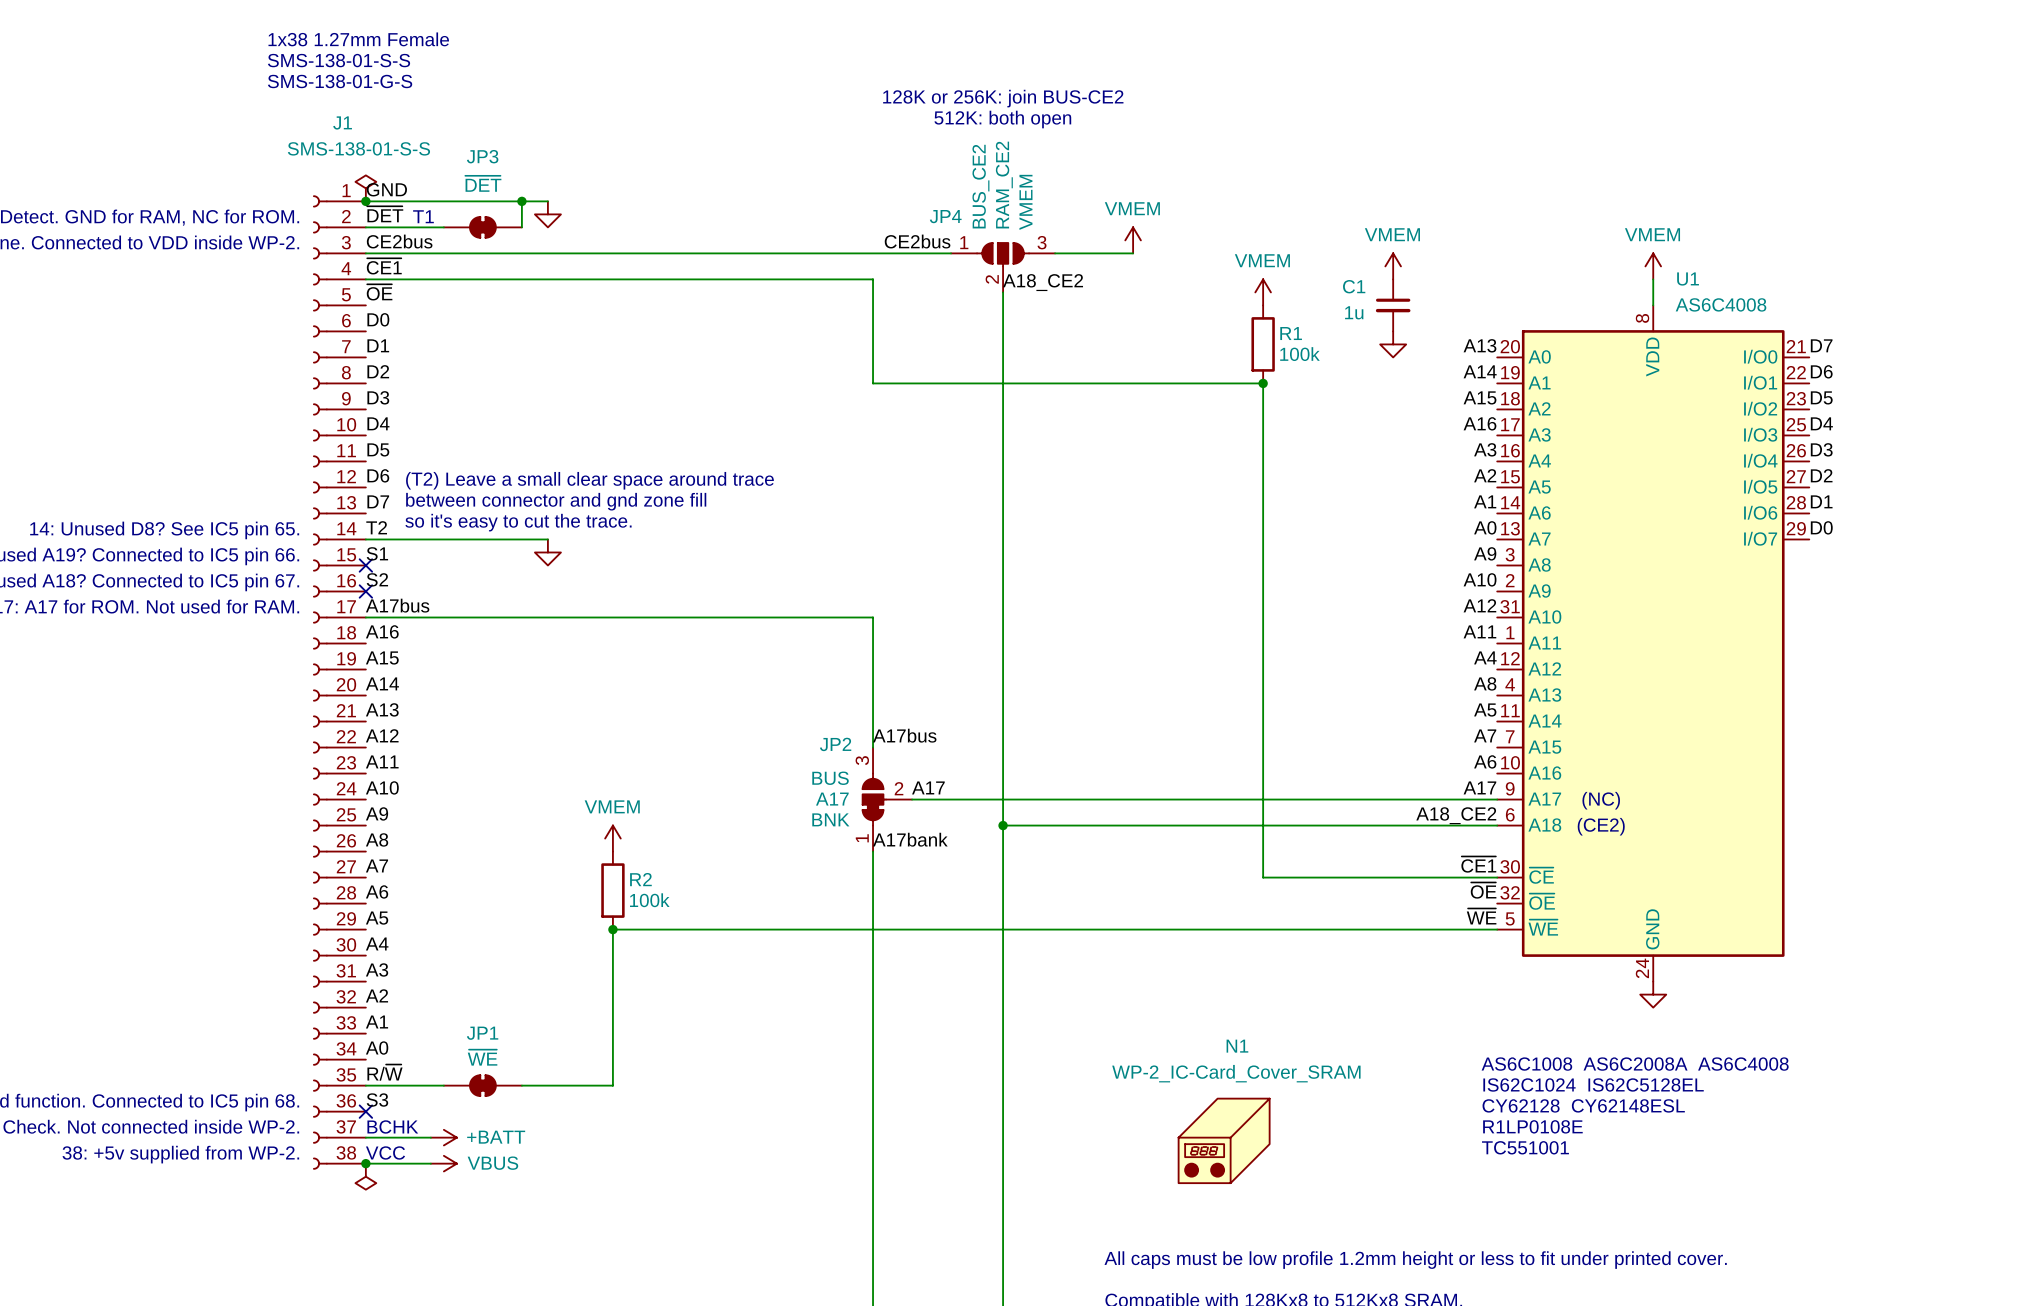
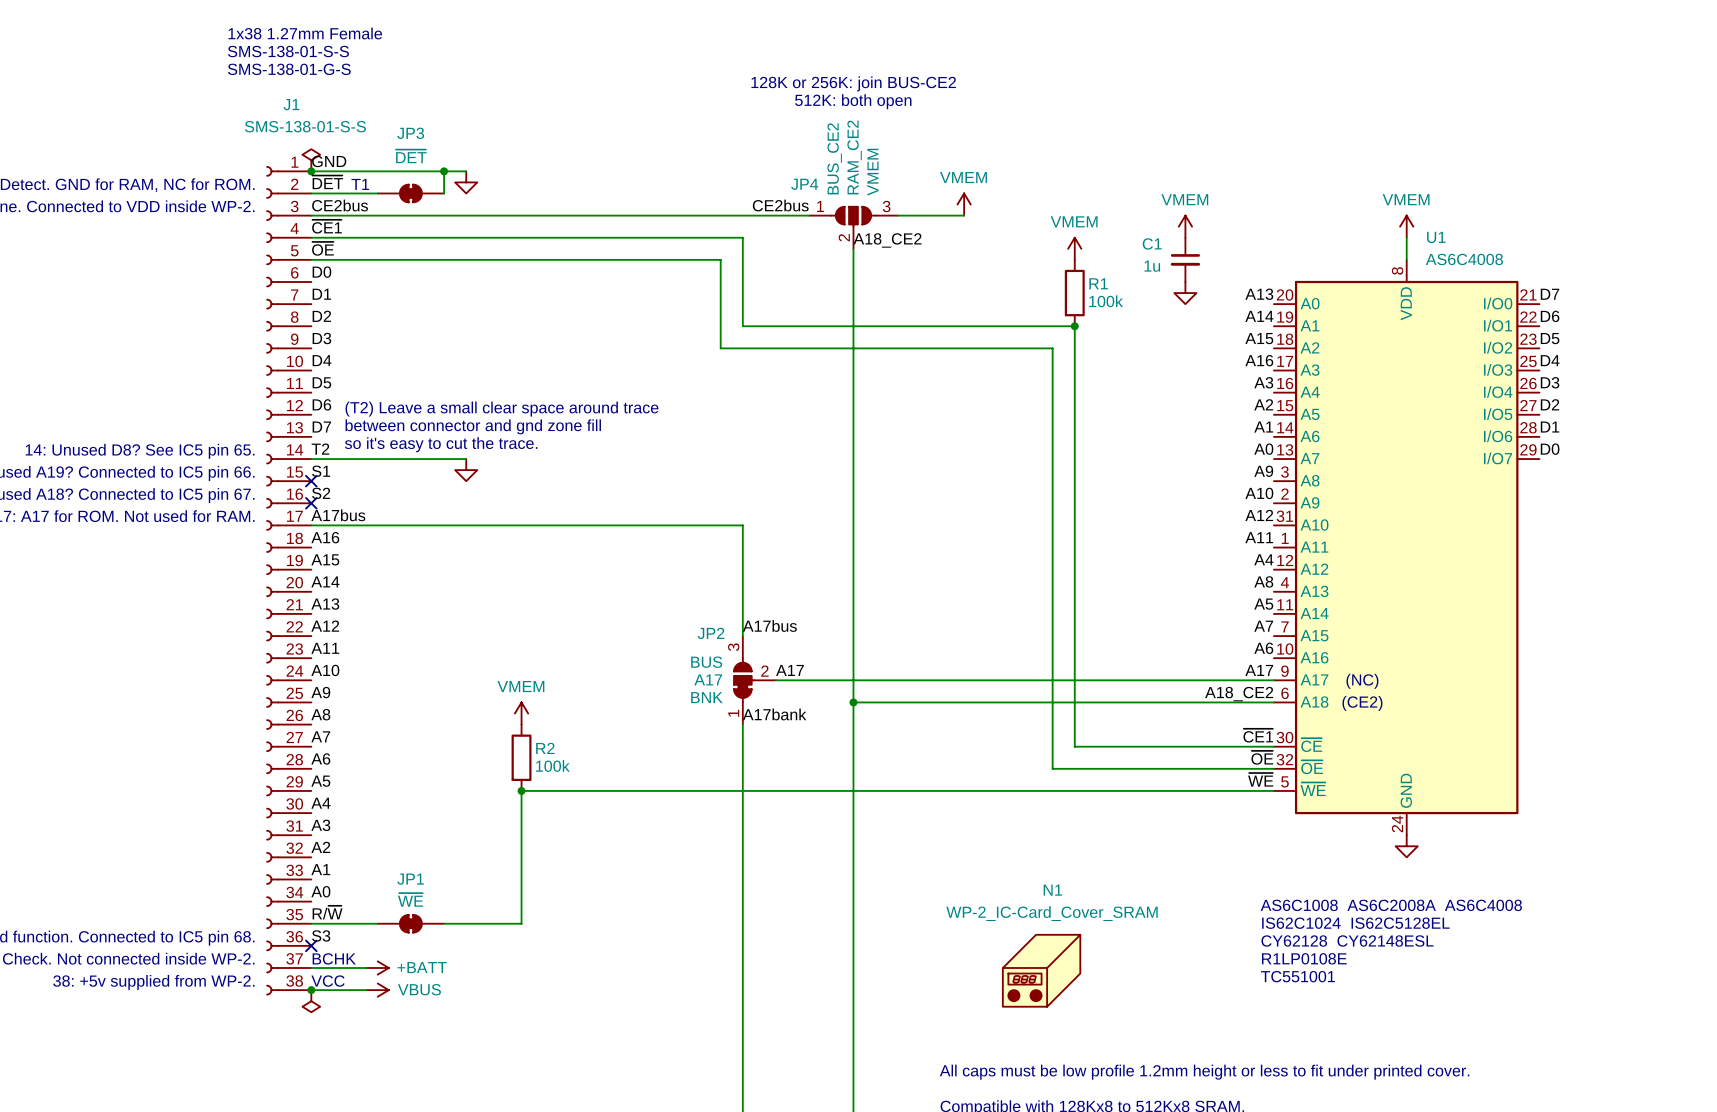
wire: none -> (311, 259) (720, 259) (720, 348) (1052, 348) (1052, 768) (1273, 768)

